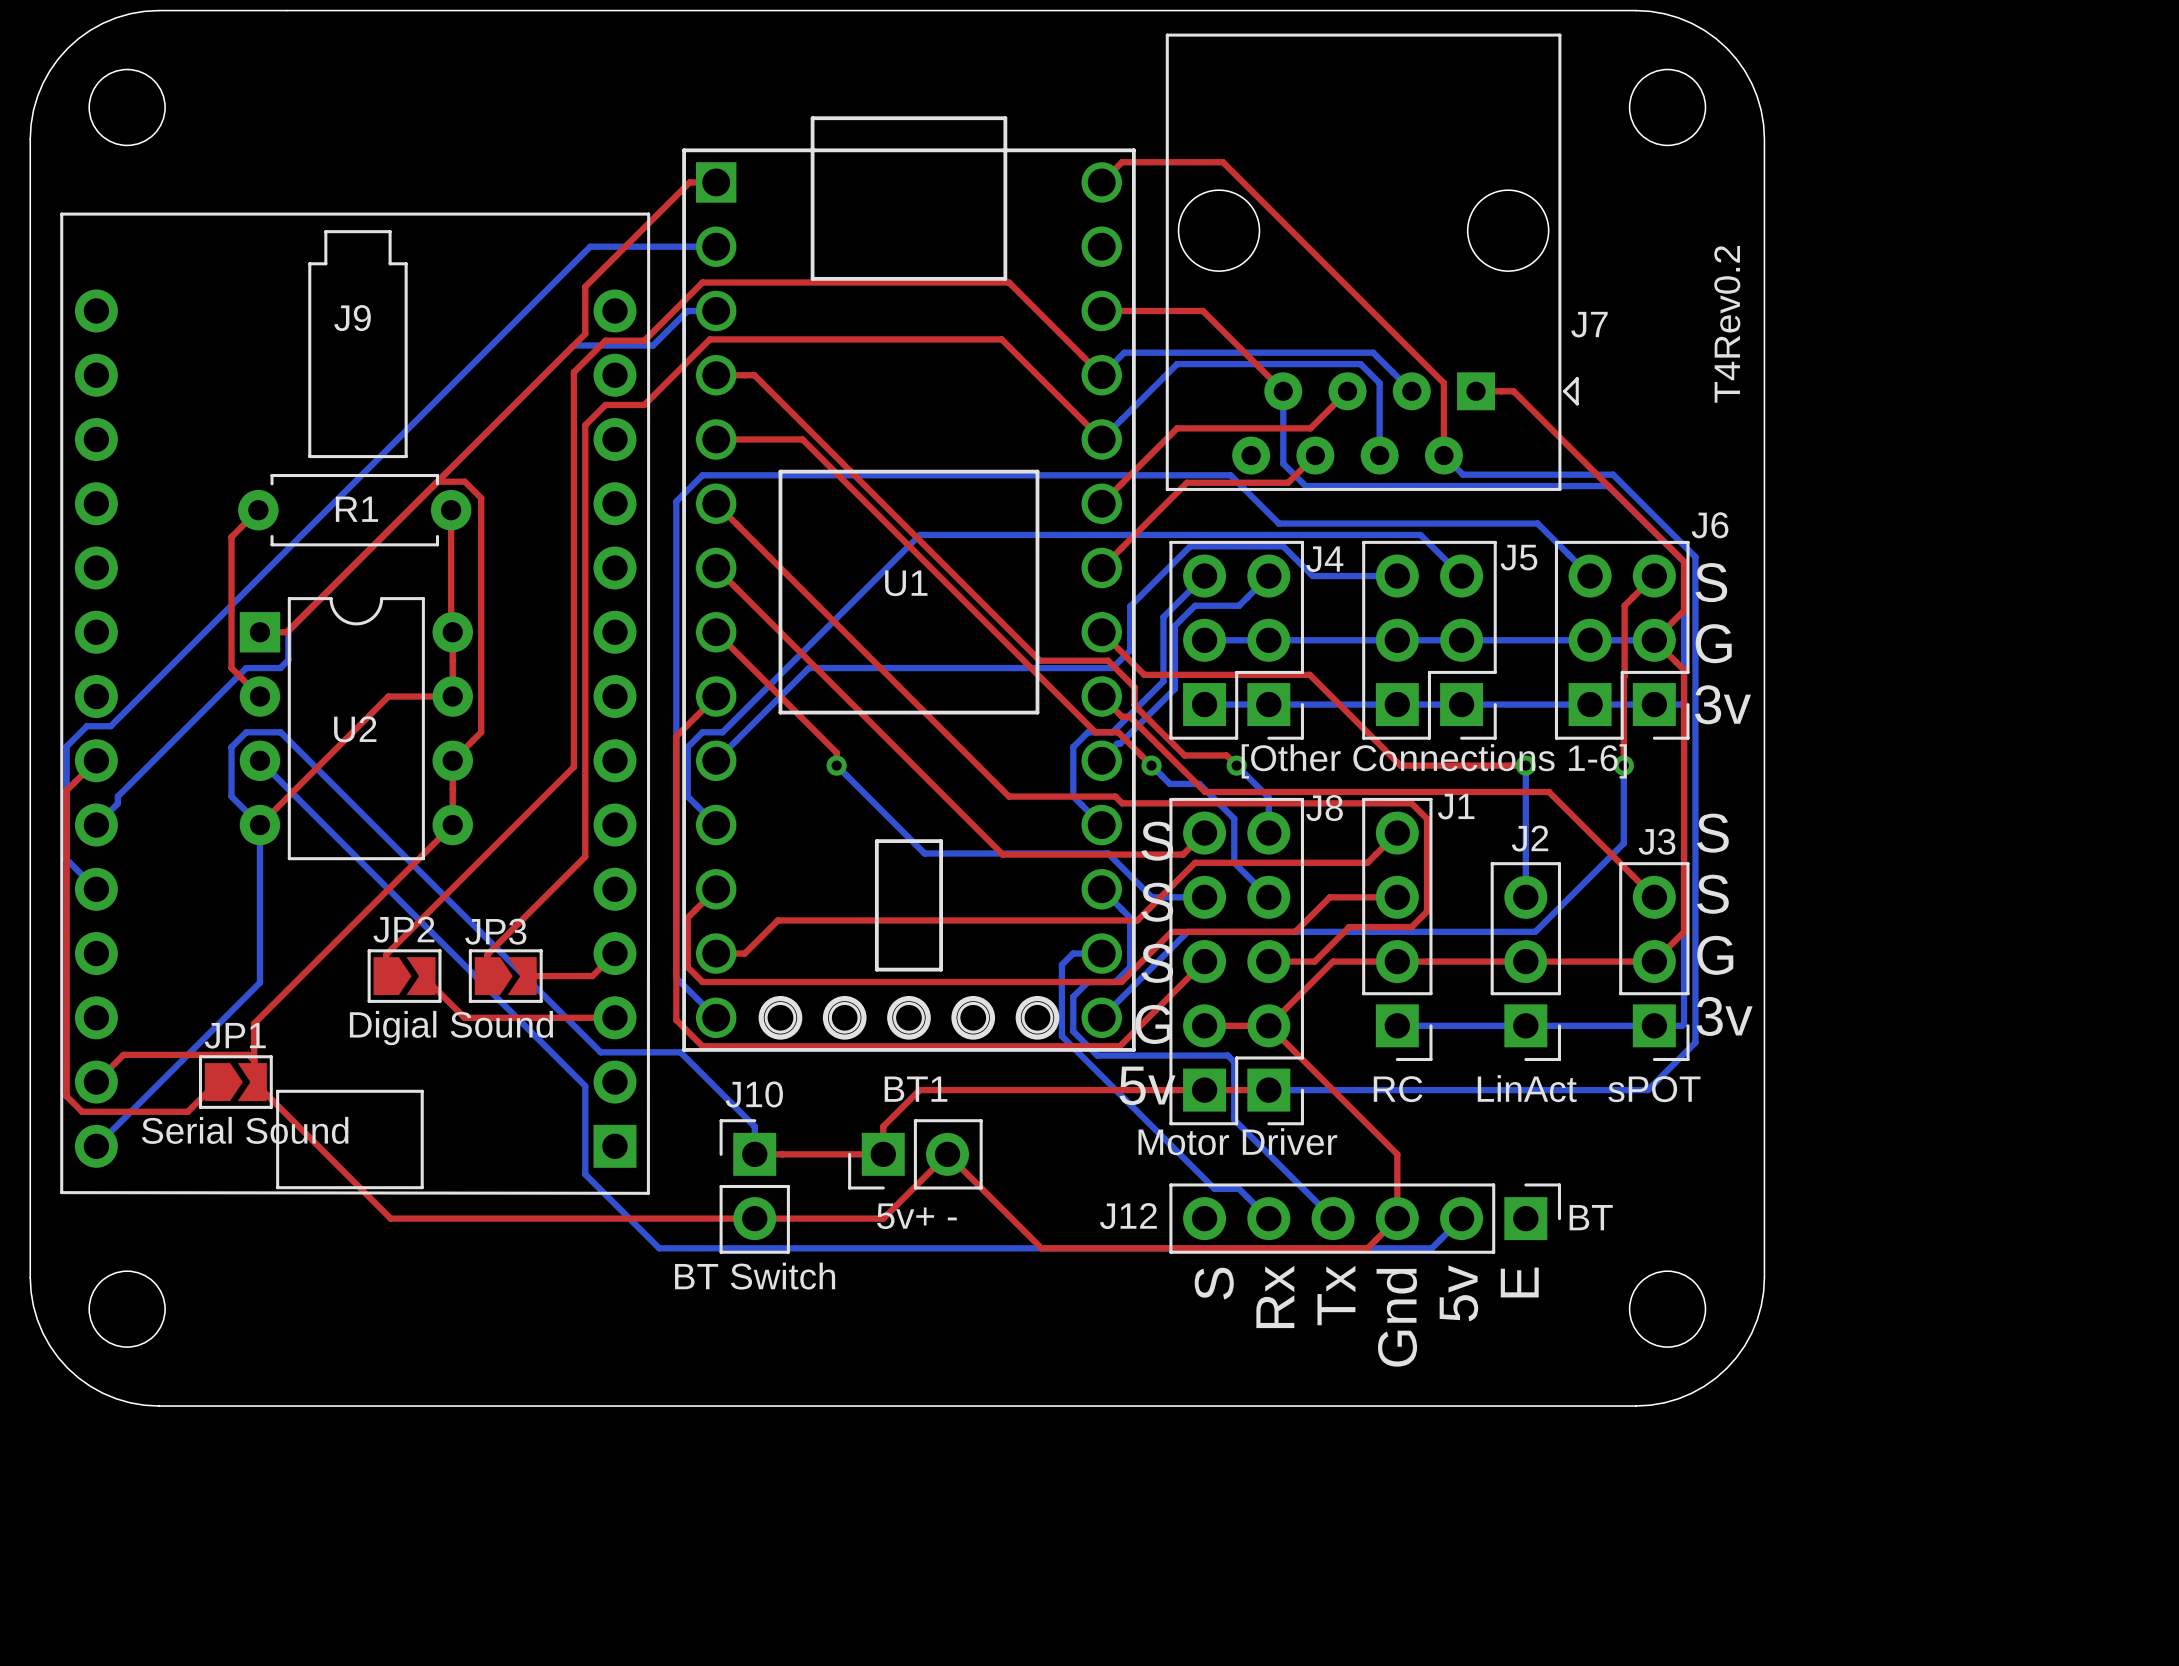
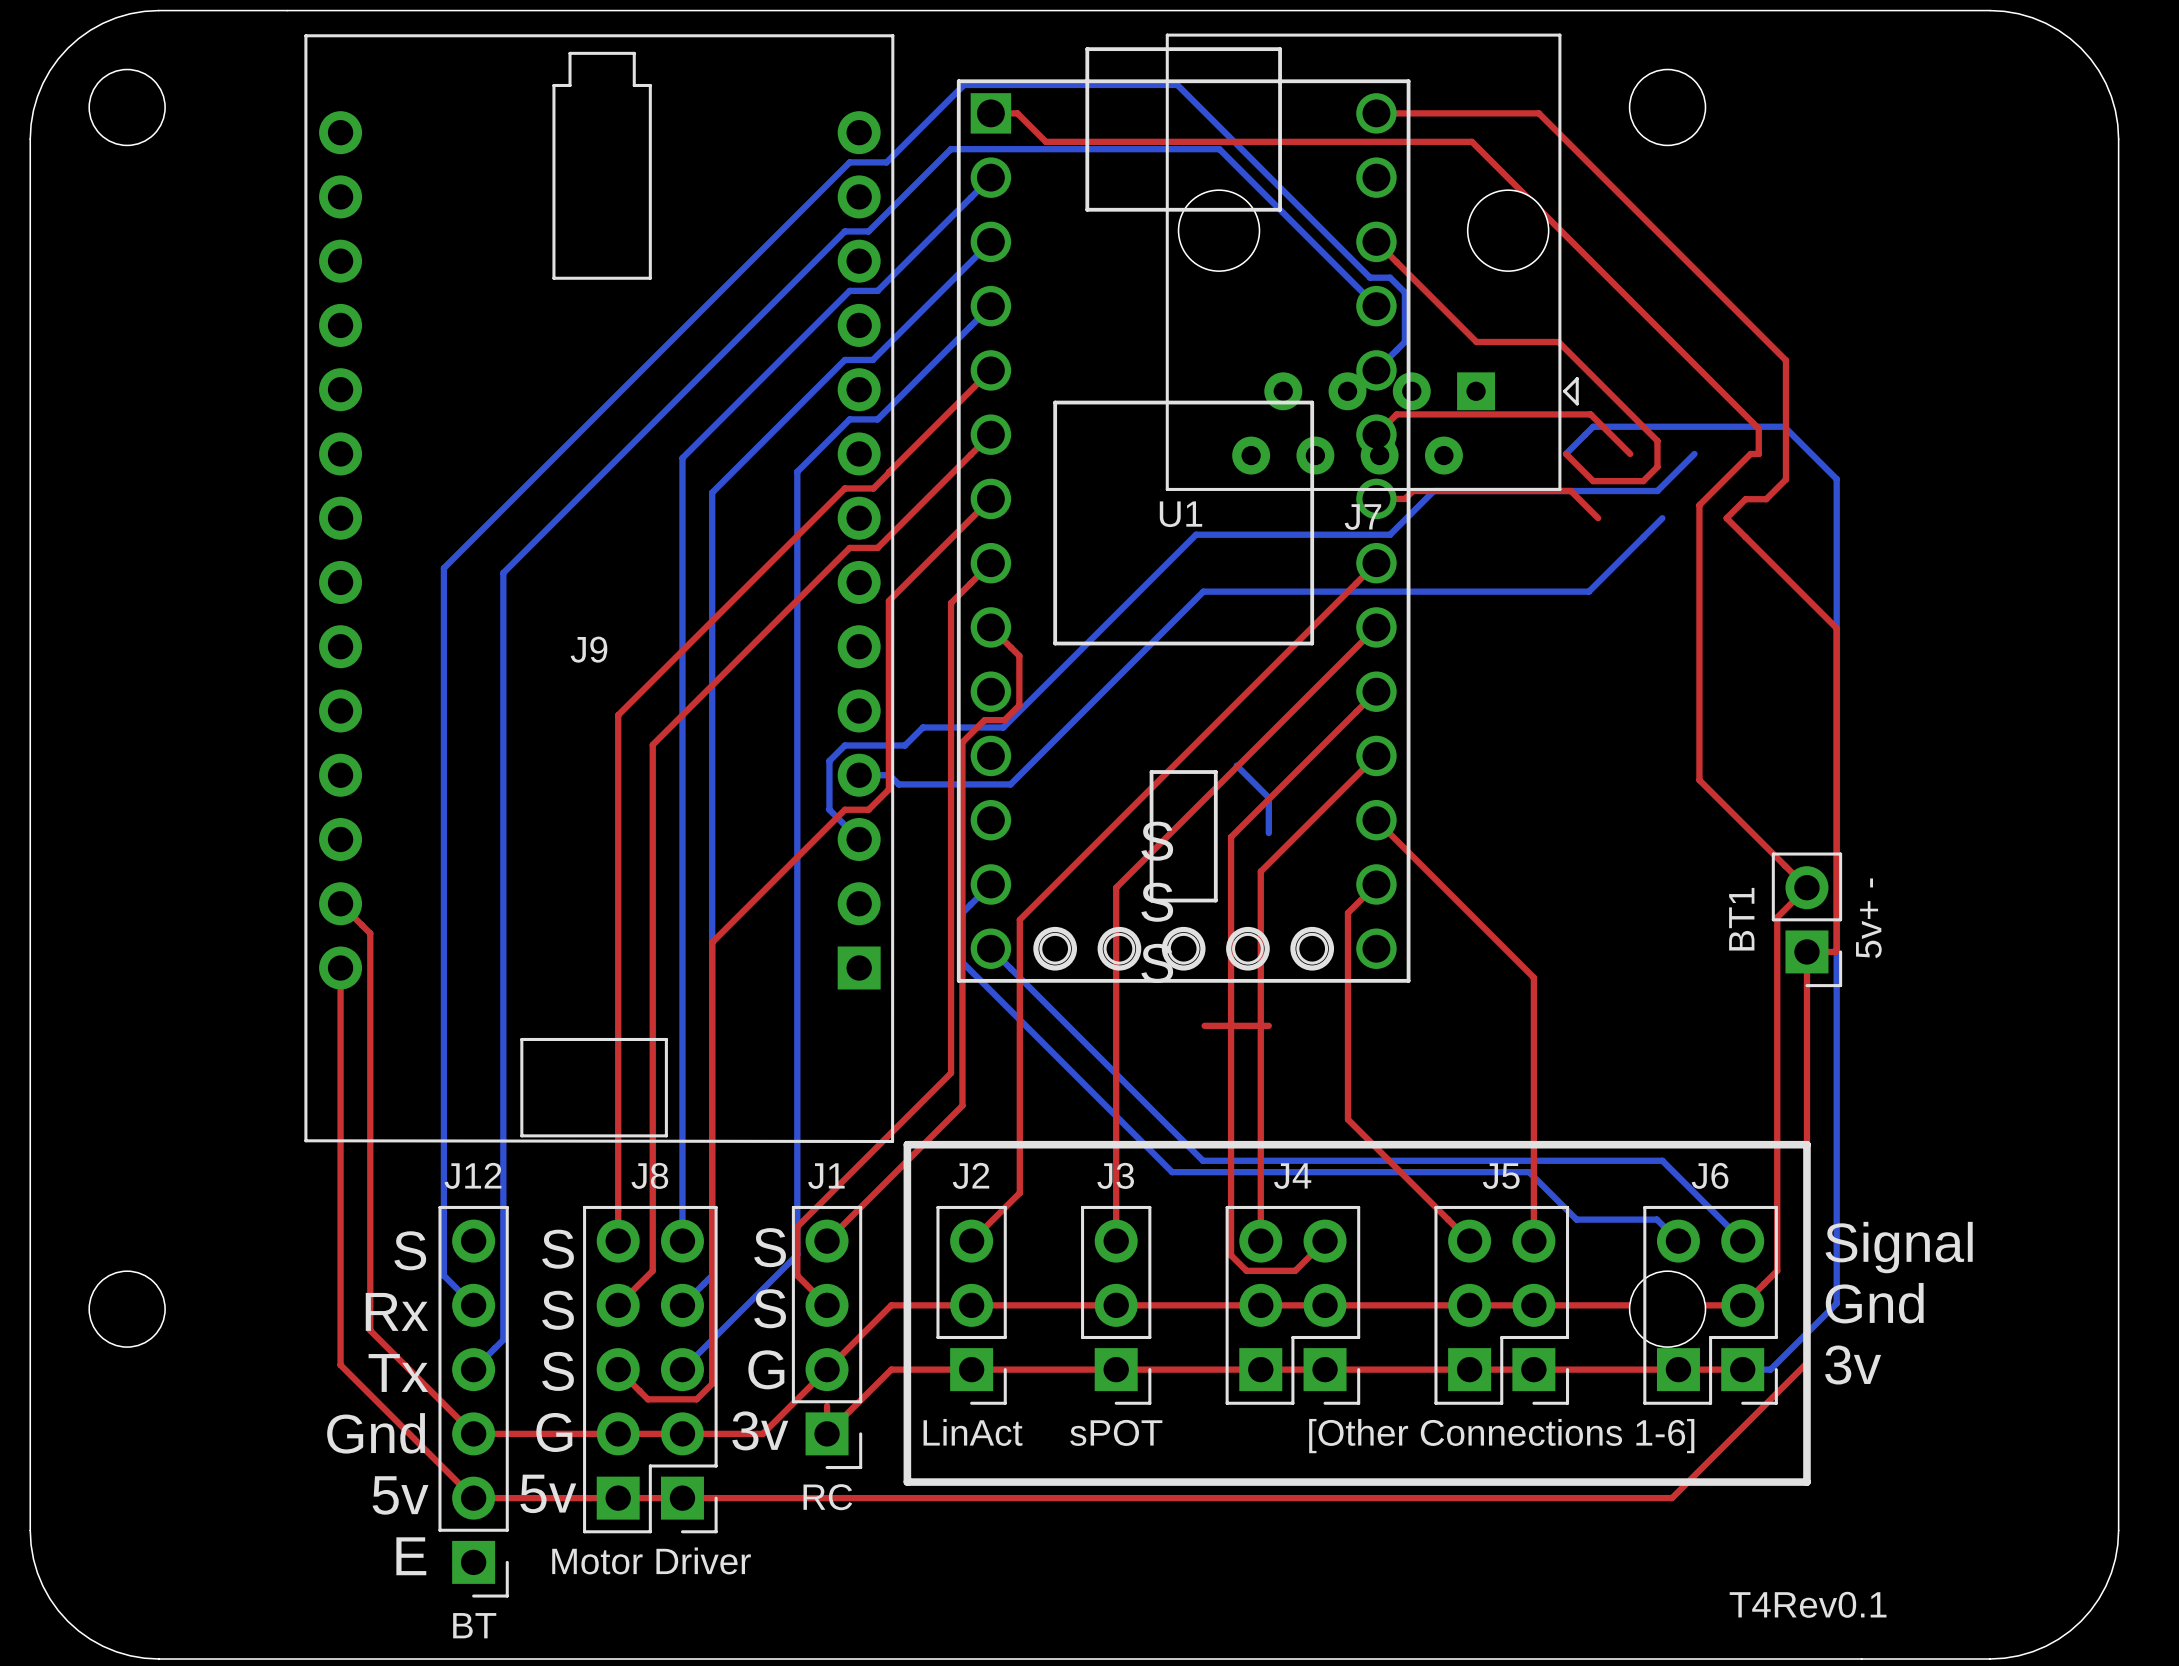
board edge: (1635, 10) (1664, 13) (1691, 23) (1716, 38) (1726, 48) (1744, 70) (1751, 83) (1761, 110) (1763, 124) (1764, 1277) (1761, 1306) (1751, 1333) (1736, 1357) (1716, 1377) (1691, 1393) (1678, 1398) (1664, 1402) (1635, 1406) (144, 1405) (116, 1398) (90, 1386) (78, 1377) (58, 1357) (49, 1345) (37, 1319) (31, 1291) (30, 1277) -> (1635, 10) (1990, 10) (2018, 13) (2045, 23) (2070, 38) (2080, 48) (2098, 70) (2111, 96) (2115, 110) (2118, 139) (2118, 1530) (2115, 1559) (2105, 1586) (2090, 1610) (2070, 1630) (2058, 1639) (2032, 1651) (2018, 1655) (1990, 1659) (158, 1659) (130, 1655) (103, 1646) (90, 1639) (67, 1621) (49, 1598) (37, 1572) (33, 1559) (30, 1530) (30, 1277)
top track: none -> (990, 113) (1017, 113) (1045, 141) (1471, 141) (1758, 428) (1758, 453) (1750, 453) (1699, 505) (1699, 780) (1806, 887) (1777, 917) (1777, 1270) (1742, 1305) (891, 1305) (762, 1433) (473, 1433) (370, 1330) (370, 933) (340, 903)
top track: none -> (1376, 113) (1538, 113) (1785, 360) (1785, 479) (1766, 499) (1745, 499) (1726, 518) (1836, 628) (1836, 950) (1834, 951) (1806, 951) (1806, 1363) (1672, 1498) (473, 1498) (340, 1365) (340, 968)
bottom track: none -> (990, 177) (877, 290) (849, 290) (682, 458) (682, 1241)
top track: (716, 182) (689, 182) (585, 286) (585, 333) (286, 632) (259, 632) -> none
top track: (1101, 182) (1121, 162) (1222, 162) (1443, 383) (1443, 455) -> none
J9 footprint: [60, 212, 651, 1195] -> [304, 34, 895, 1144]
bottom track: none -> (990, 241) (872, 359) (844, 359) (712, 492) (712, 1275) (682, 1305)
top track: none -> (1376, 241) (1476, 342) (1558, 342) (1657, 440) (1657, 467) (1643, 481) (1593, 481) (1566, 453)
bottom track: (716, 246) (590, 246) (110, 726) (86, 726) (66, 746) (66, 859) (96, 889) -> none
bottom track: none -> (990, 306) (877, 419) (849, 419) (797, 471) (797, 1254) (682, 1369)
bottom track: none -> (1376, 306) (1219, 149) (950, 149) (868, 231) (844, 231) (503, 573) (503, 1339) (473, 1369)
bottom track: (716, 310) (687, 310) (653, 345) (573, 345) (288, 630) (288, 660) (280, 668) (246, 668) (117, 796) (117, 803) (96, 825) -> none
top track: (1101, 310) (1202, 310) (1283, 391) -> none
J9 name position: J9 (352, 318) -> J9 (589, 649)
J7 name position: J7 (1589, 324) -> J7 (1362, 517)
text: T4Rev0.2 (1727, 324) -> none
top track: none -> (990, 370) (873, 488) (844, 488) (618, 715) (618, 1257)
bottom track: none -> (1376, 370) (1404, 341) (1404, 292) (1390, 277) (1370, 277) (1177, 84) (964, 84) (886, 162) (849, 162) (443, 568) (443, 1275) (473, 1305)
top track: (716, 375) (754, 375) (1039, 660) (1108, 660) (1134, 687) (1134, 705) (1184, 755) (1226, 755) (1236, 765) -> none
top track: (1101, 375) (1009, 282) (702, 282) (644, 340) (605, 340) (573, 372) (573, 766) (386, 954) (386, 976) -> none
bottom track: (1101, 375) (1124, 352) (1373, 352) (1411, 391) -> none
bottom track: (1283, 391) (1283, 463) (1305, 486) (1608, 486) (1684, 561) (1684, 702) (1682, 704) -> none
top track: (1347, 391) (1310, 428) (1177, 428) (1101, 503) -> none
top track: (1476, 391) (1513, 391) (1684, 561) (1684, 610) (1654, 640) (1684, 670) (1684, 931) (1654, 961) (1333, 961) (1268, 1025) (1397, 1154) (1397, 1218) (1367, 1248) (1041, 1248) (947, 1154) (883, 1218) (390, 1218) (254, 1082) (254, 1023) (452, 825) (452, 760) (481, 732) (481, 498) (464, 481) (437, 481) -> none
top track: none -> (990, 434) (877, 547) (849, 547) (652, 744) (652, 1270) (618, 1305)
top track: none -> (1376, 434) (1396, 414) (1590, 414) (1630, 453)
top track: (716, 439) (802, 439) (1095, 732) (1118, 732) (1151, 765) -> none
top track: (1101, 439) (1001, 339) (709, 339) (644, 404) (605, 404) (585, 425) (585, 856) (487, 954) (487, 976) -> none
bottom track: (1101, 439) (1177, 364) (1360, 364) (1379, 383) (1379, 455) -> none
bottom track: none -> (1566, 453) (1593, 426) (1784, 426) (1836, 479) (1836, 1303) (1770, 1369) (1742, 1369)
bottom track: none -> (1694, 453) (1657, 491) (1433, 491) (1390, 534) (1196, 534) (1003, 727) (922, 727) (904, 745) (844, 745) (829, 760) (829, 809) (859, 839)
top track: (1315, 455) (1288, 482) (1187, 482) (1101, 568) -> none
bottom track: (1443, 455) (1463, 474) (1613, 474) (1695, 557) (1695, 1042) (1647, 1090) (1268, 1090) -> none
top track: none -> (990, 498) (888, 600) (888, 789) (868, 809) (844, 809) (712, 942) (712, 1383) (696, 1399) (647, 1399) (618, 1369)
top track: none -> (1376, 498) (1405, 498) (1412, 491) (1570, 491) (1598, 518)
top track: (716, 503) (1009, 796) (1115, 796) (1122, 803) (1411, 803) (1427, 818) (1427, 911) (1411, 927) (1349, 927) (1314, 961) (1268, 961) -> none
top track: (258, 510) (231, 537) (231, 668) (259, 696) -> none
R1: (354, 510) -> none
top track: (451, 510) (452, 696) (388, 696) (259, 825) -> none
bottom track: none -> (1662, 518) (1588, 591) (1203, 591) (1010, 784) (898, 784) (889, 775) (859, 775)
J6 name position: J6 (1710, 525) -> J6 (1710, 1175)
J5 name position: J5 (1518, 557) -> J5 (1501, 1176)
J4 name position: J4 (1324, 559) -> J4 (1292, 1176)
top track: none -> (990, 563) (951, 603) (951, 1073) (797, 1226) (797, 1275) (827, 1305)
top track: none -> (1376, 563) (1019, 919) (1019, 1192) (971, 1241)
top track: (716, 568) (1002, 854) (1183, 854) (1204, 833) -> none
bottom track: (1204, 576) (1163, 617) (1163, 681) (1112, 732) (1088, 732) (1073, 747) (1073, 796) (1101, 825) -> none
bottom track: (1268, 576) (1239, 605) (1195, 605) (1174, 626) (1174, 688) (1101, 760) -> none
bottom track: (1397, 576) (1312, 576) (1283, 546) (1190, 546) (1130, 606) (1130, 650) (1112, 668) (808, 668) (716, 760) -> none
bottom track: (1461, 576) (1420, 534) (919, 534) (722, 732) (702, 732) (687, 747) (687, 796) (716, 825) -> none
bottom track: (1590, 576) (1537, 523) (1278, 523) (1230, 475) (702, 475) (676, 501) (676, 977) (716, 1017) -> none
top track: (1654, 576) (1624, 605) (1623, 765) -> none
text: S (1711, 582) -> none
U1 position: (908, 584) -> (1183, 514)
top track: none -> (990, 627) (1019, 655) (1019, 705) (1004, 720) (984, 720) (962, 742) (962, 1105) (827, 1241)
top track: none -> (1376, 627) (1116, 887) (1116, 1241)
top track: (1101, 632) (1144, 674) (1309, 674) (1400, 765) (1525, 765) -> none
bottom track: (1204, 640) (1654, 640) -> none
J4 position: (1236, 640) -> (1292, 1305)
J5 position: (1429, 640) -> (1501, 1305)
J6 position: (1622, 640) -> (1710, 1305)
text: G (1713, 643) -> none
top track: (716, 645) (716, 632) (836, 752) (836, 765) -> none
top track: none -> (1376, 691) (1231, 837) (1231, 1255) (1246, 1270) (1295, 1270) (1325, 1241)
top track: (716, 696) (676, 736) (676, 1020) (702, 1046) (1119, 1046) (1204, 961) -> none
top track: (1101, 696) (1121, 716) (1129, 716) (1205, 791) (1548, 791) (1654, 897) -> none
bottom track: (1204, 704) (1682, 704) -> none
bottom track: (1682, 704) (1684, 706) (1684, 1023) (1682, 1025) (1397, 1025) -> none
text: 3v (1723, 704) -> none
U2: (356, 728) -> none
top track: none -> (1376, 755) (1260, 871) (1260, 1241)
top track: (96, 760) (66, 790) (66, 1096) (82, 1111) (187, 1111) (217, 1082) -> none
bottom track: (259, 760) (585, 1086) (585, 1174) (659, 1248) (1431, 1248) (1461, 1218) -> none
J5 value position: [Other Connections 1-6] (1434, 761) -> [Other Connections 1-6] (1501, 1436)
bottom track: (836, 765) (924, 853) (1108, 853) (1151, 897) (1204, 897) -> none
via: (836, 765) -> none
bottom track: (1151, 765) (1169, 783) (1199, 783) (1234, 818) (1234, 862) (1268, 897) -> none
via: (1151, 765) -> none
via: (1236, 765) -> none
bottom track: (1525, 765) (1525, 897) -> none
via: (1525, 765) -> none
bottom track: (1623, 765) (1623, 843) (1535, 931) (1187, 931) (1101, 1017) -> none
via: (1623, 765) -> none
J1 name position: J1 (1456, 806) -> J1 (826, 1176)
J8 name position: J8 (1324, 808) -> J8 (649, 1175)
top track: none -> (1376, 820) (1533, 977) (1533, 1241)
top track: (1397, 833) (1367, 862) (1195, 862) (1137, 920) (777, 920) (744, 953) (716, 953) -> none
text: S (1712, 833) -> none
J2 name position: J2 (1530, 838) -> J2 (970, 1175)
J3 name position: J3 (1657, 841) -> J3 (1115, 1175)
bottom track: none -> (990, 884) (962, 912) (962, 962) (1172, 1172) (1529, 1172) (1576, 1219) (1656, 1219) (1678, 1241)
top track: none -> (1376, 884) (1347, 912) (1347, 1119) (1469, 1241)
top track: (716, 889) (687, 917) (687, 967) (702, 982) (1121, 982) (1171, 931) (1295, 931) (1329, 897) (1397, 897) -> none
bottom track: (1101, 889) (1130, 917) (1130, 967) (1115, 982) (1088, 982) (1073, 996) (1073, 1031) (1097, 1055) (1227, 1055) (1234, 1062) (1234, 1119) (1333, 1218) -> none
text: S (1712, 894) -> none
J1 position: (1397, 929) -> (827, 1337)
bottom track: none -> (990, 948) (1202, 1160) (1662, 1160) (1742, 1241)
top track: (614, 953) (592, 976) (524, 976) -> none
bottom track: (1101, 953) (1073, 953) (1061, 964) (1061, 1036) (1214, 1188) (1239, 1188) (1268, 1218) -> none
text: G (1715, 955) -> none
J8 position: (1236, 961) -> (650, 1369)
J2 position: (1525, 961) -> (971, 1305)
J3 position: (1654, 961) -> (1116, 1305)
JP2: (404, 976) -> none
top track: (422, 976) (464, 1017) (614, 1017) -> none
JP3: Digial Sound (505, 976) -> none
text: 3v (1724, 1016) -> none
text: G (1153, 1024) -> none
top track: (254, 1060) (248, 1054) (123, 1054) (96, 1082) -> none
JP1: Serial Sound (235, 1082) -> none
text: 5v (1147, 1085) -> none
top track: (1268, 1090) (919, 1090) (883, 1126) (883, 1154) (754, 1154) -> none
J8 value position: Motor Driver (1237, 1141) -> Motor Driver (651, 1560)
line: none -> (907, 1144) (1806, 1144) (1806, 1482) (907, 1482) (907, 1144)
bottom track: (96, 1146) (259, 982) (259, 825) (231, 796) (231, 747) (246, 732) (280, 732) (600, 1052) (680, 1052) (754, 1126) (754, 1154) -> none
BT1 rotation: 0° (915, 1154) -> 90° counterclockwise (1806, 919)
BT1 position: (915, 1154) -> (1806, 919)
J10: BT Switch (754, 1186) -> none
J12 rotation: 0° (1365, 1218) -> 90° clockwise (473, 1401)
J12 position: (1365, 1218) -> (473, 1401)
text: none -> S (770, 1247)
text: none -> Signal (1899, 1247)
text: none -> S (558, 1249)
text: none -> S (410, 1250)
text: E (1519, 1282) -> none
text: S (1214, 1283) -> none
text: 5v (1458, 1293) -> none
text: Tx (1336, 1295) -> none
text: Rx (1275, 1296) -> none
text: none -> S (770, 1308)
text: none -> S (558, 1310)
text: none -> Rx (396, 1311)
text rotation: 0° (1396, 1317) -> 90° clockwise (1874, 1303)
text position: Gnd (1396, 1317) -> Gnd (1874, 1303)
text: none -> 3v (1853, 1365)
text: none -> G (766, 1369)
top track: none -> (1742, 1369) (891, 1369) (827, 1433) (827, 1406)
text: none -> S (558, 1371)
text: none -> Tx (398, 1372)
text: none -> 3v (760, 1430)
text: none -> G (554, 1432)
text: none -> Gnd (376, 1433)
text: none -> 5v (548, 1493)
text: none -> 5v (400, 1495)
text: none -> E (411, 1556)
text: none -> T4Rev0.1 (1808, 1604)

